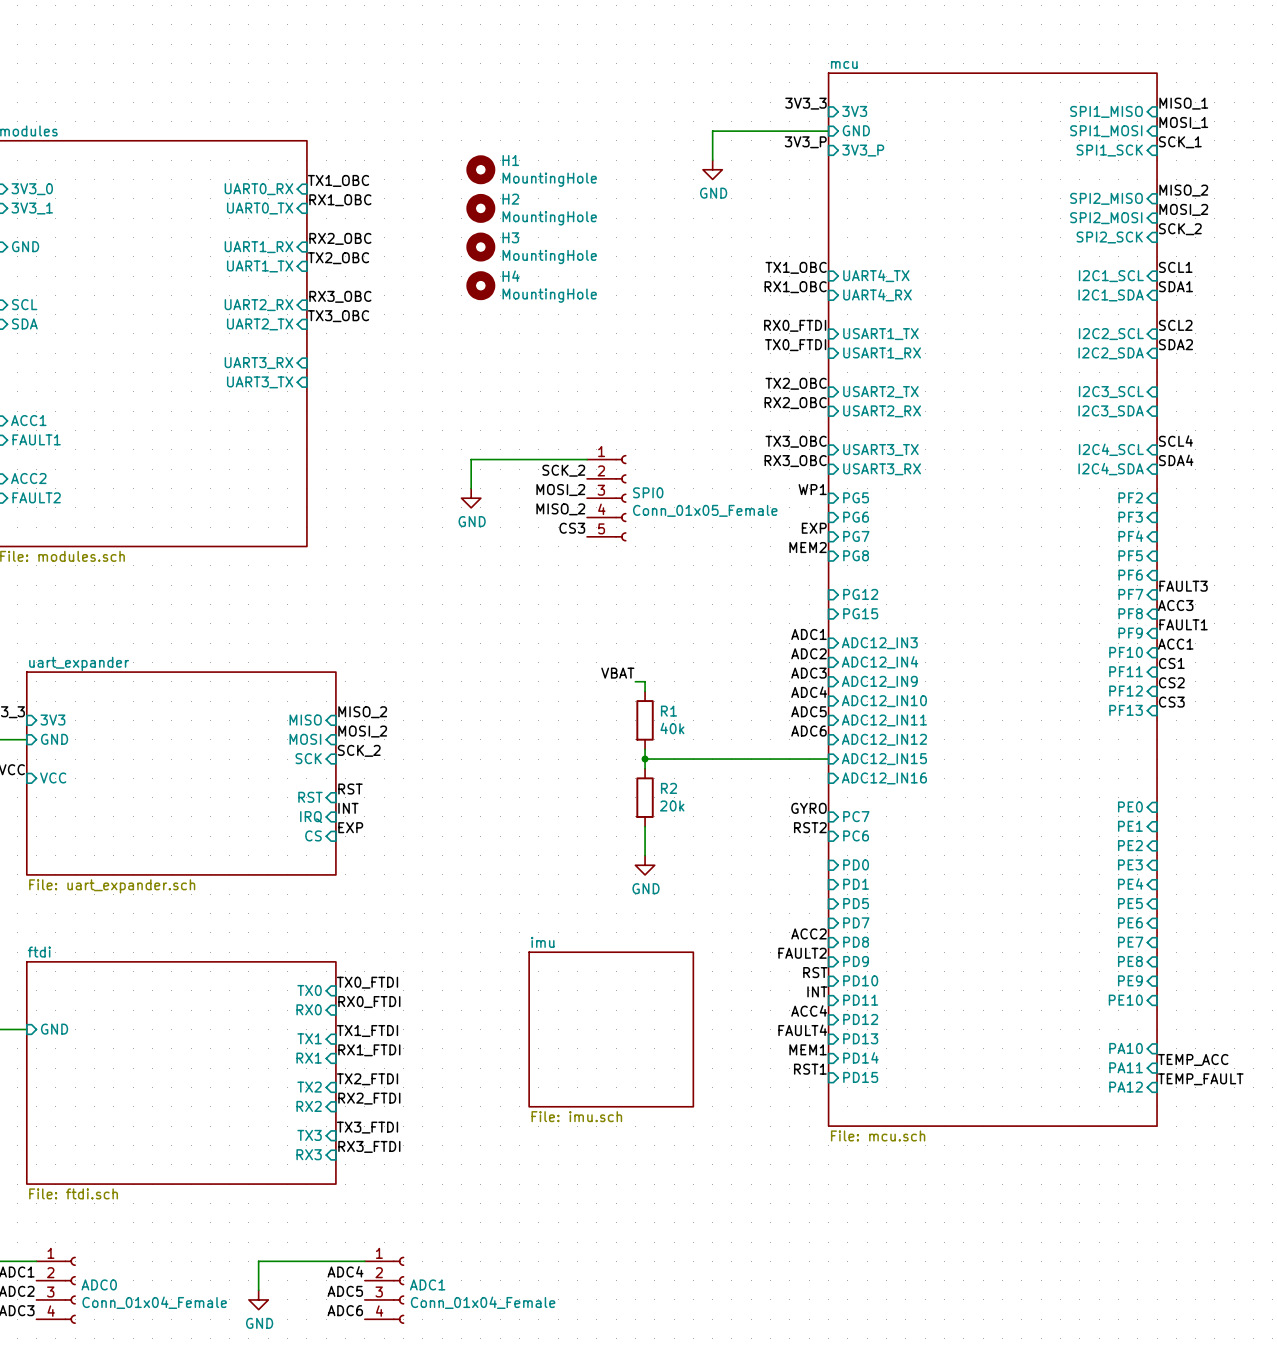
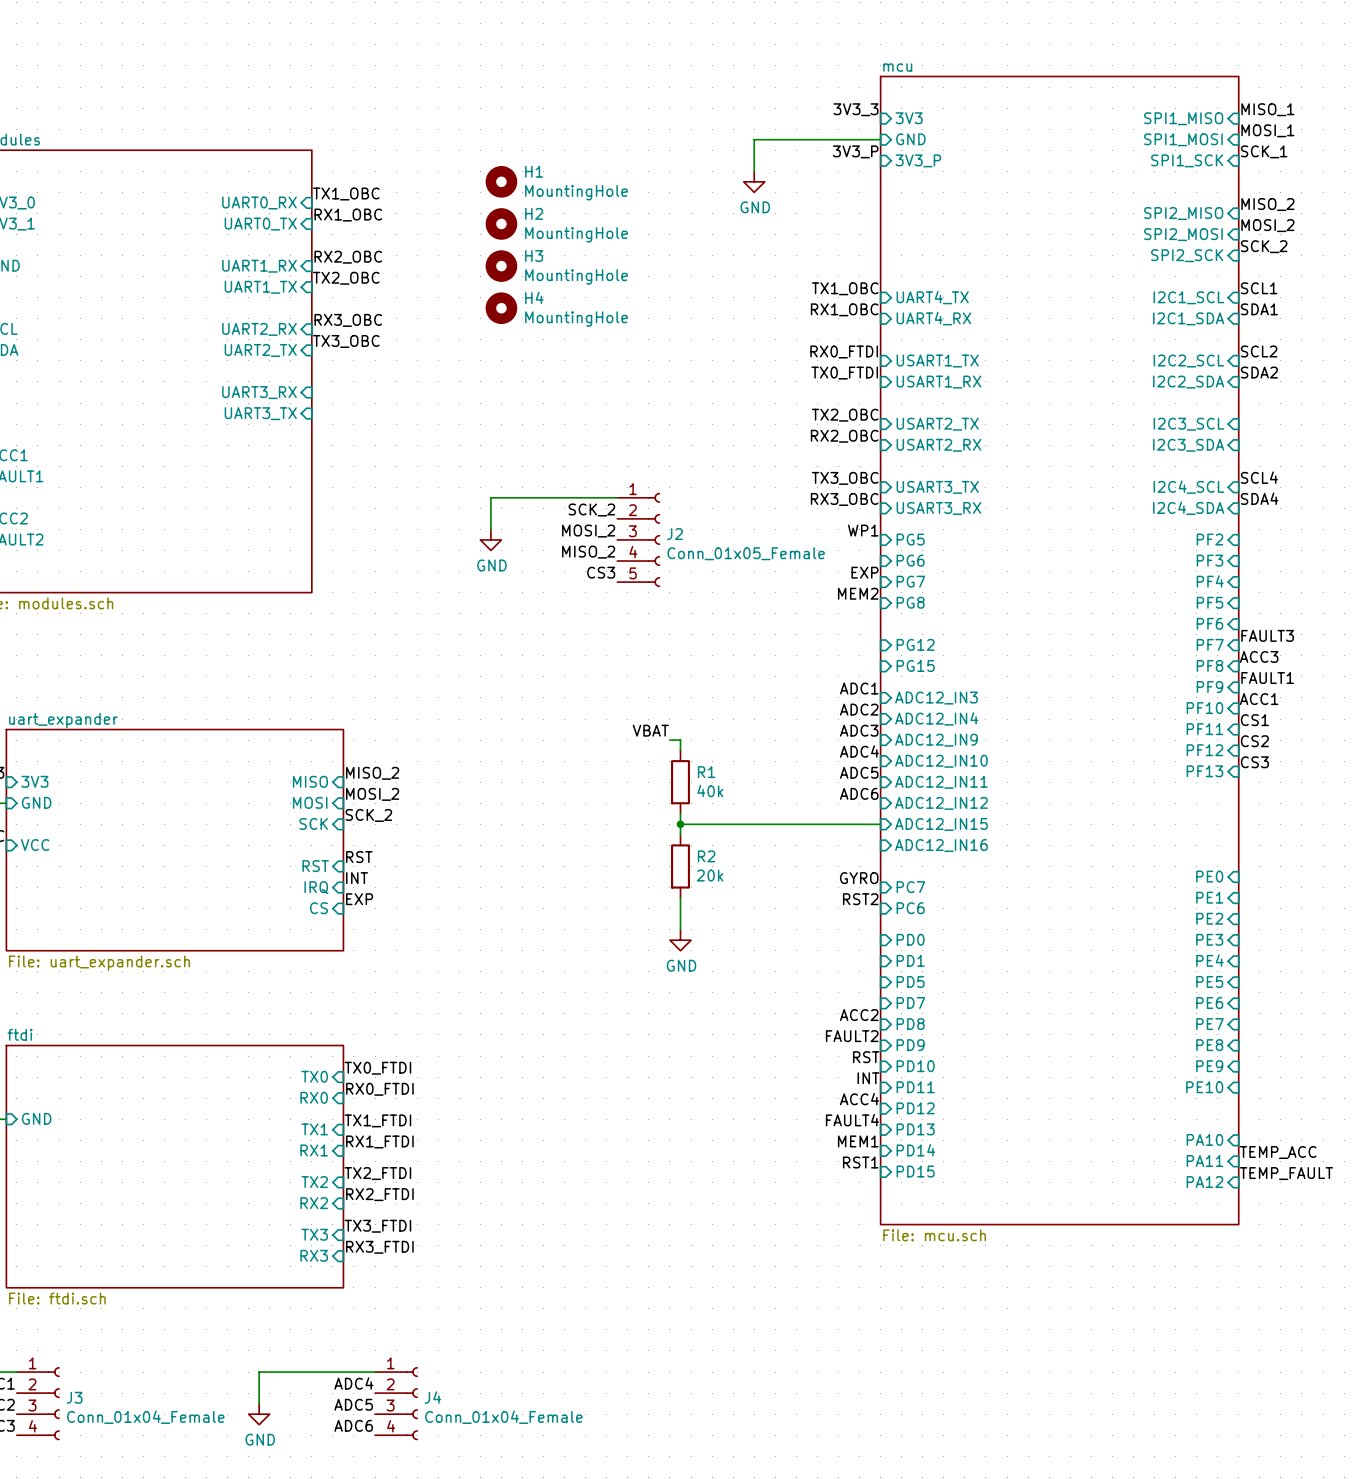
SPI0 name: SPI0 (648, 492) -> J2 (674, 534)
sheet imu: File: imu.sch (611, 1029) -> none
ADC0 name: ADC0 (99, 1284) -> J3 (74, 1397)
ADC1 name: ADC1 (427, 1284) -> J4 (432, 1397)

